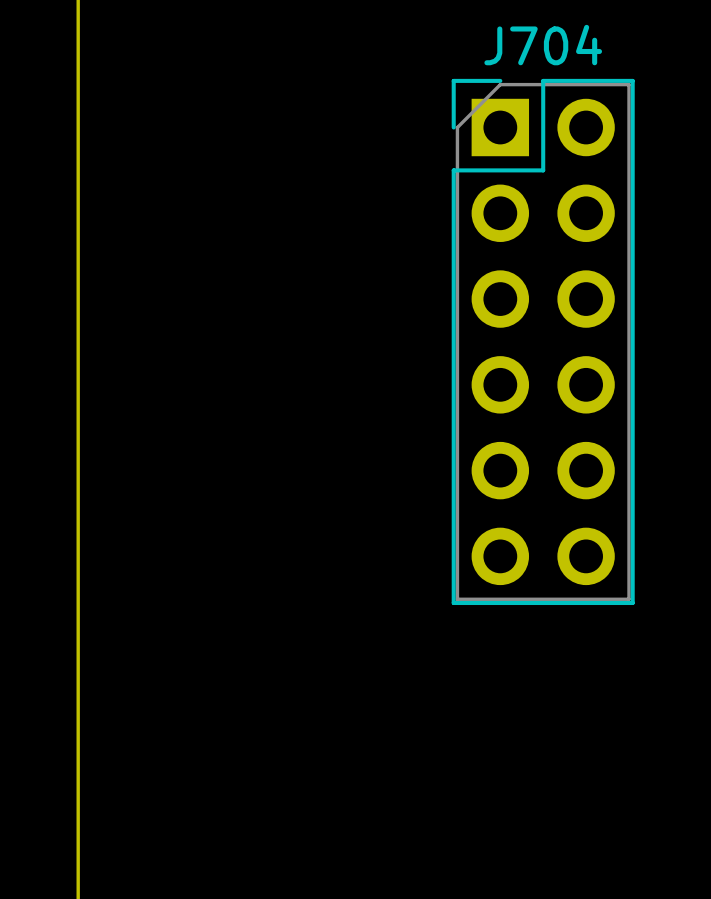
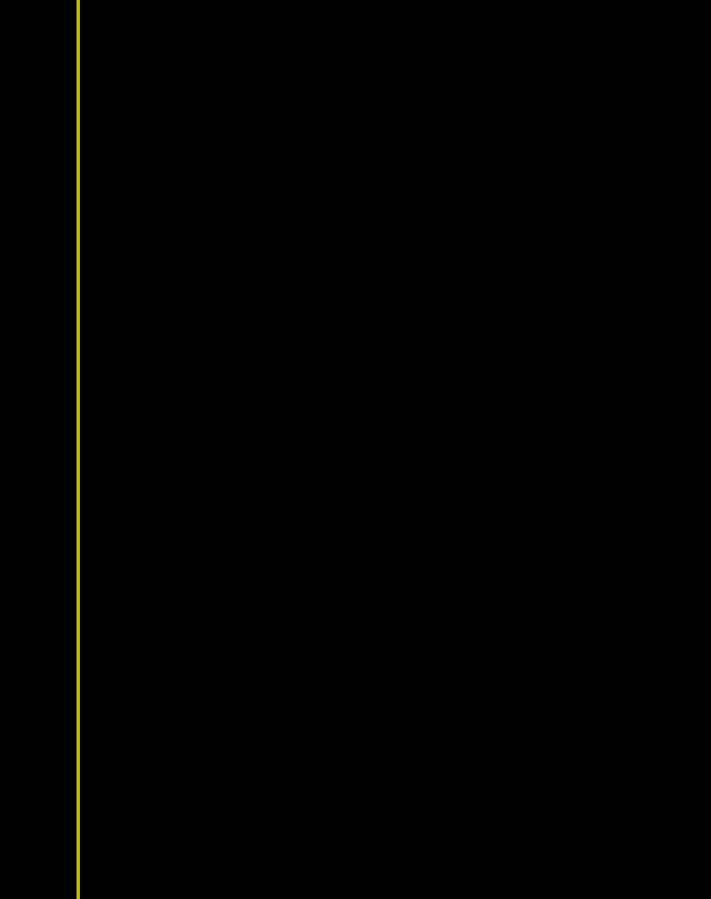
J704: (543, 341) -> none

